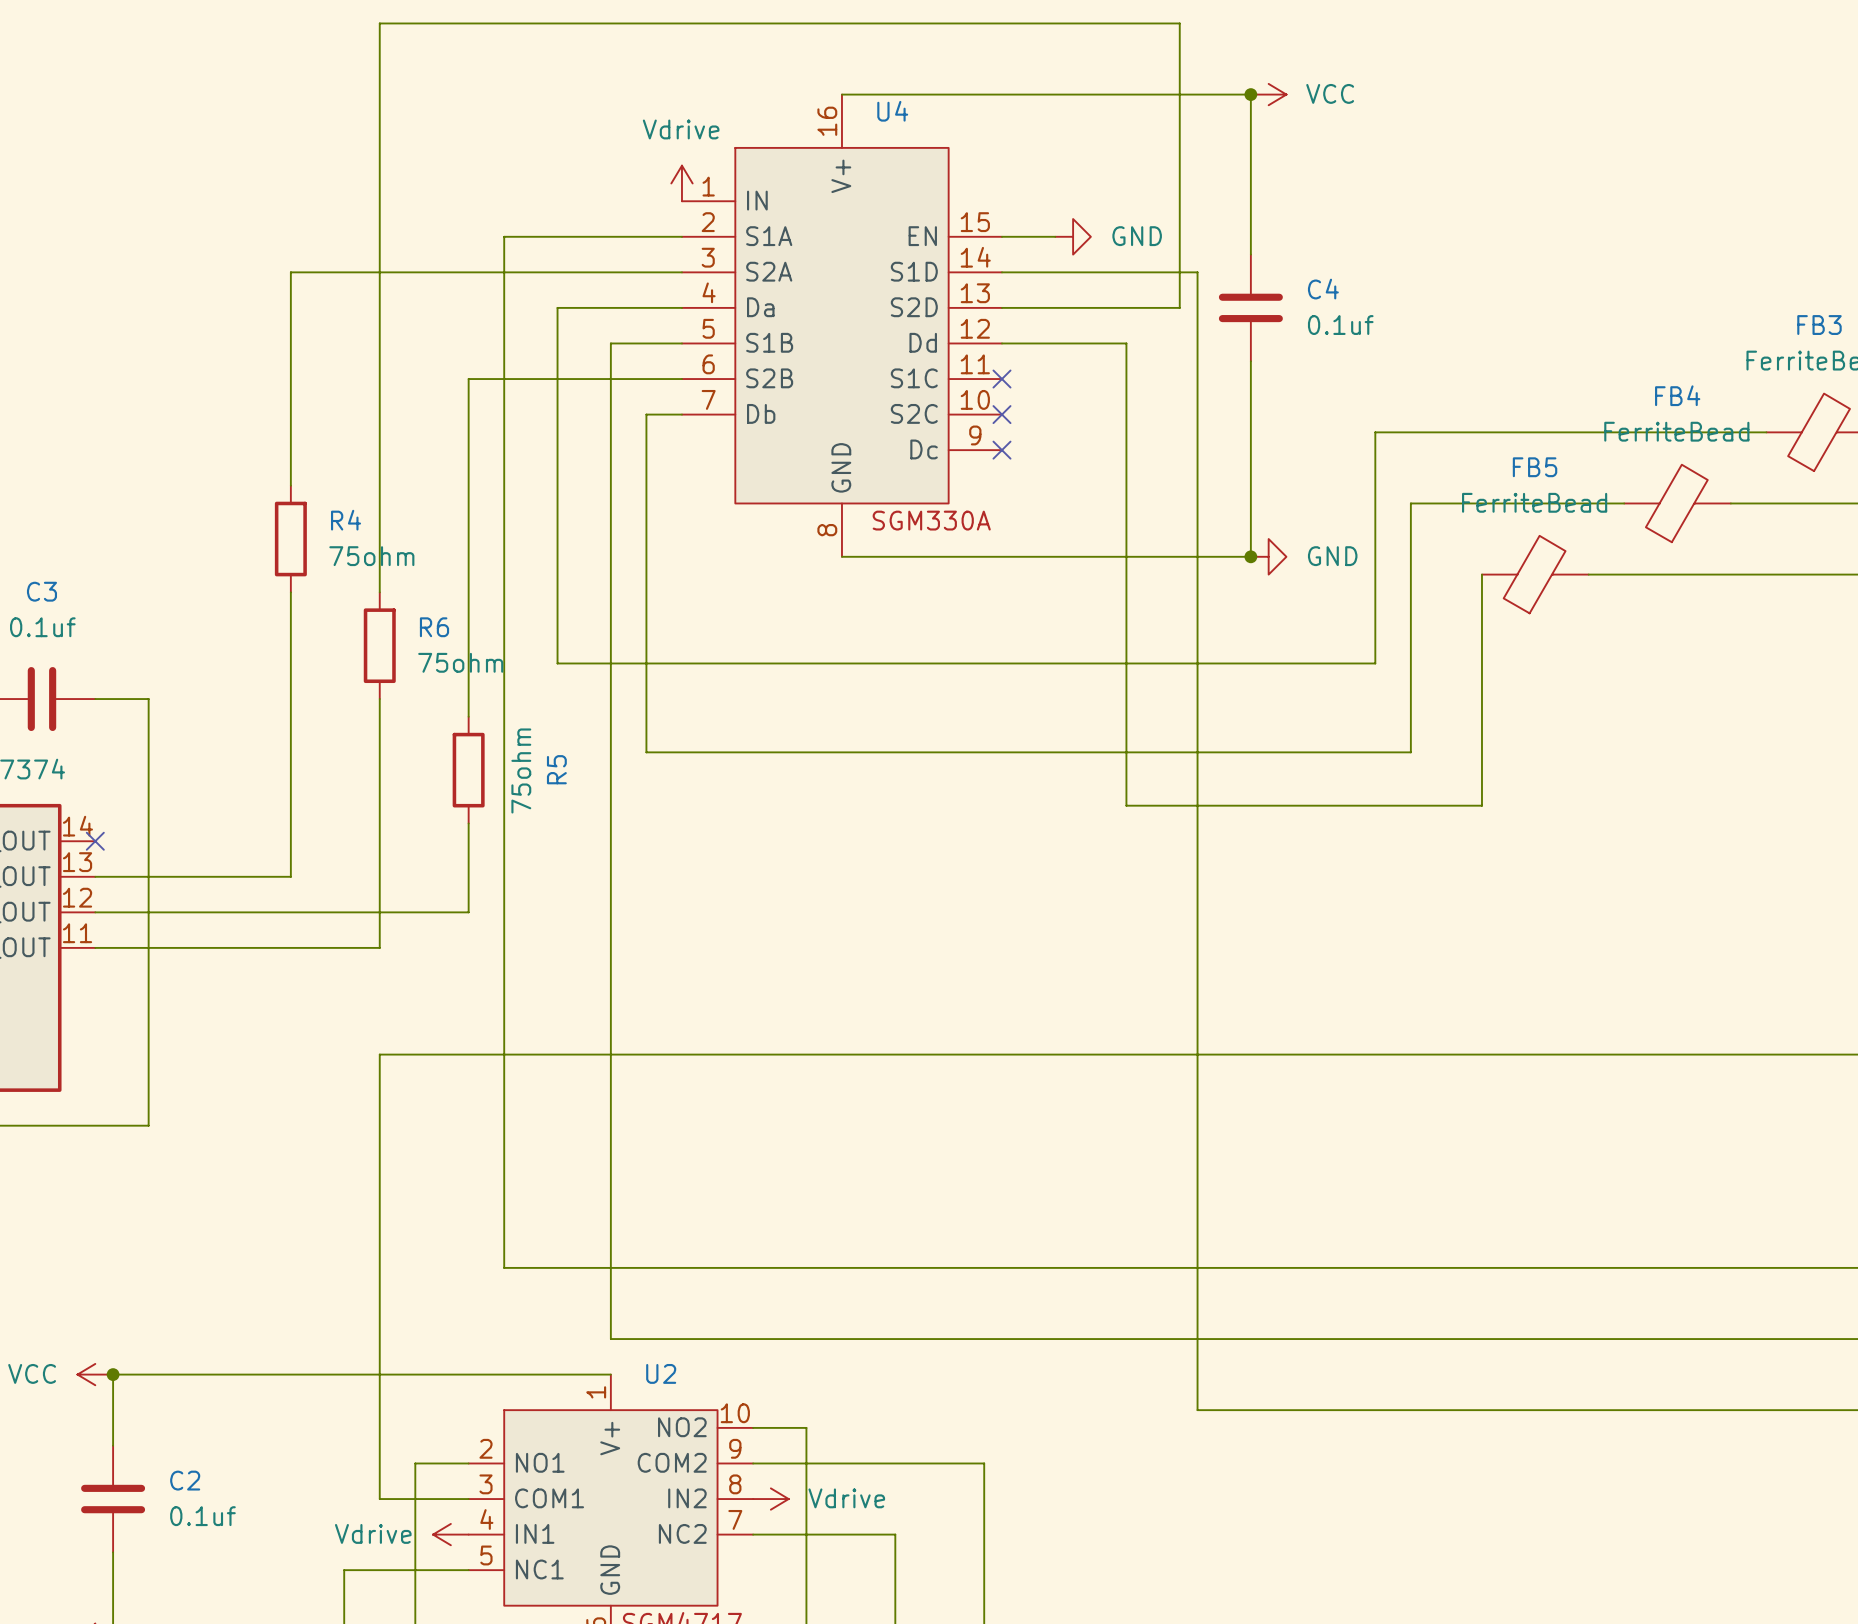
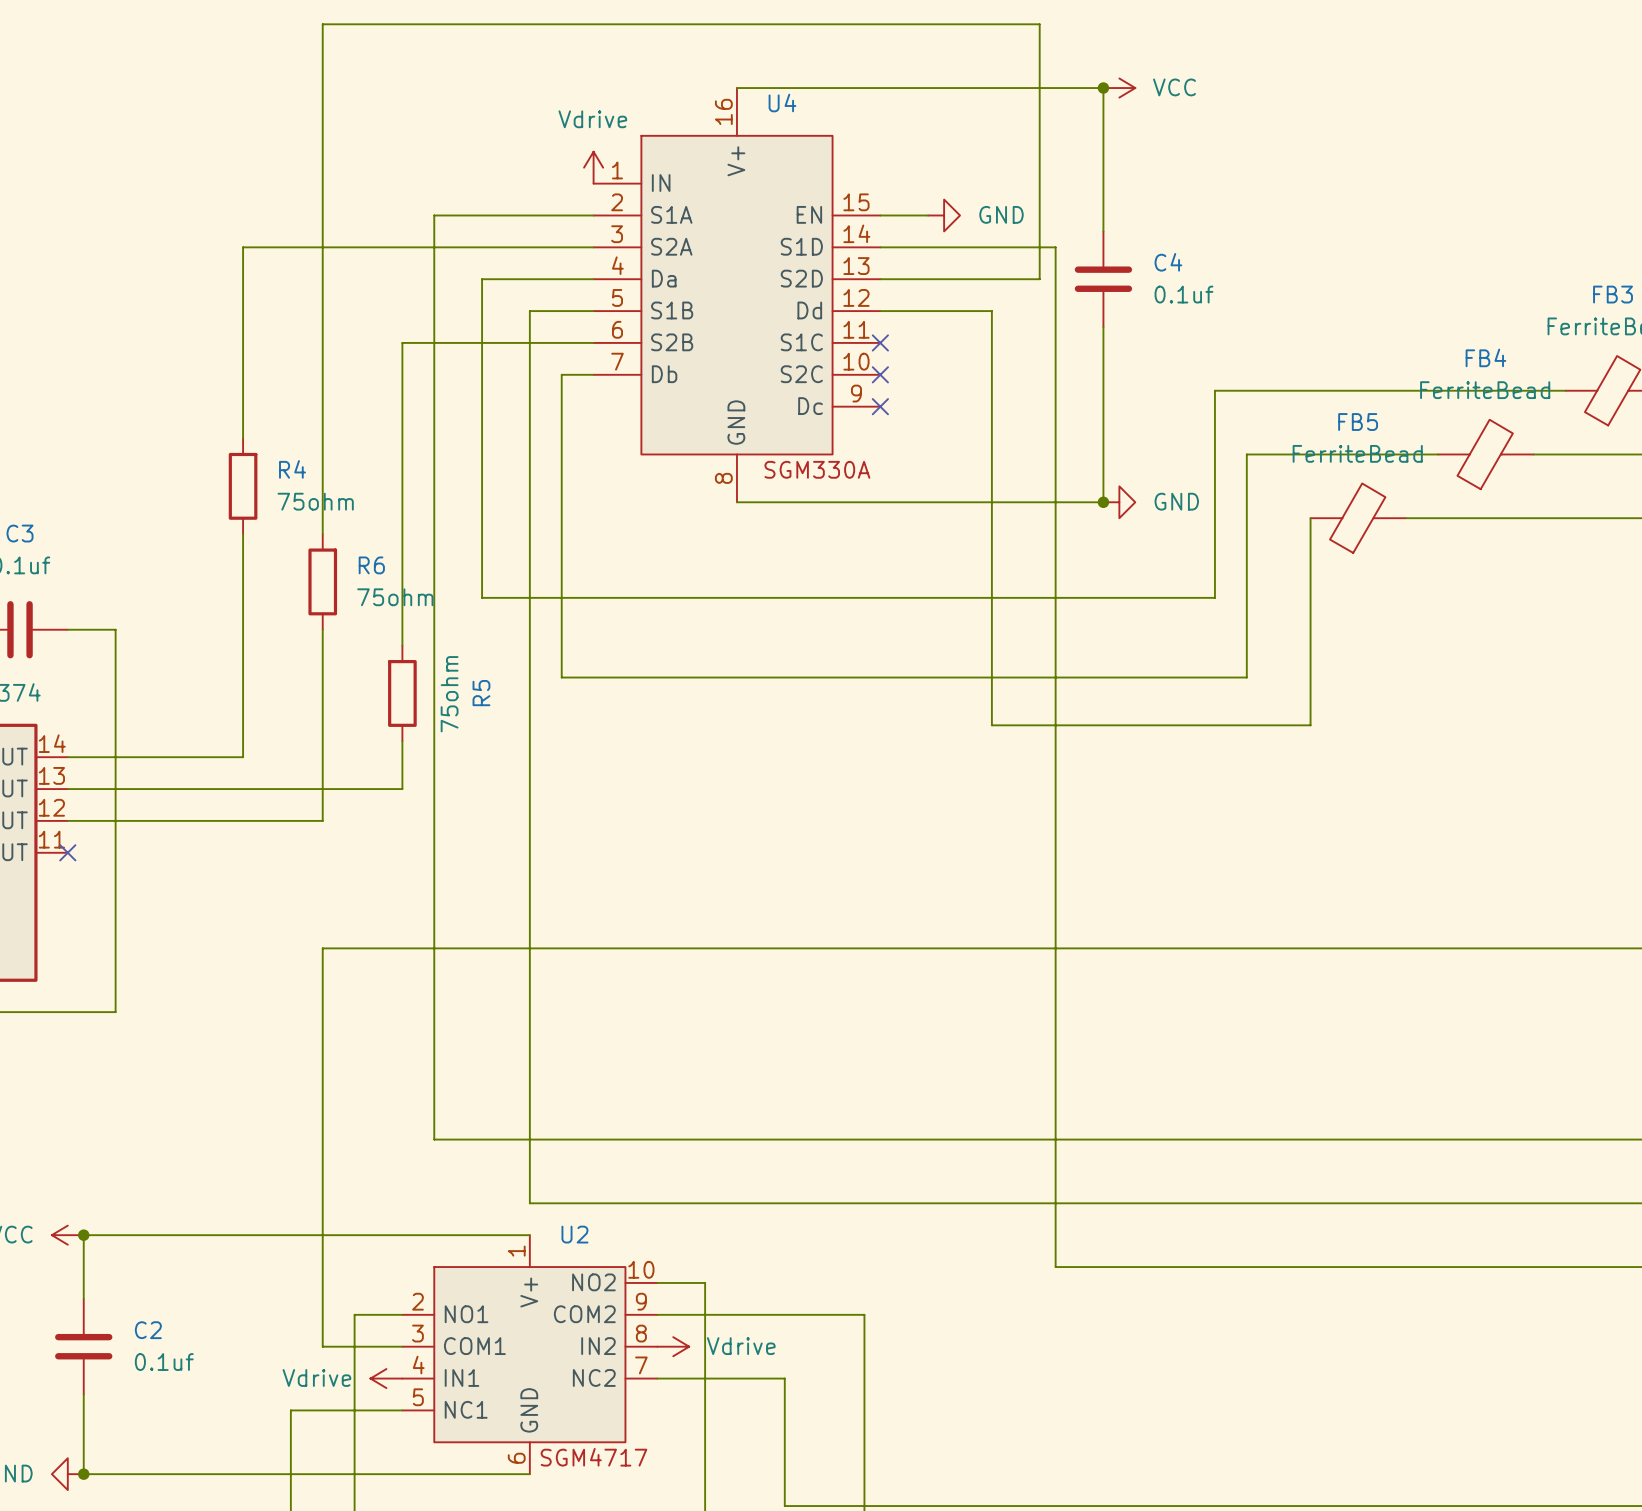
wire: none -> (67, 757) (243, 757)
no-connect mark: (95, 841) -> none
wire: (290, 841) (290, 876) -> (402, 789) (243, 789)
wire: (468, 876) (468, 912) (379, 912) (379, 947) (95, 947) -> none
no-connect mark: none -> (67, 852)

